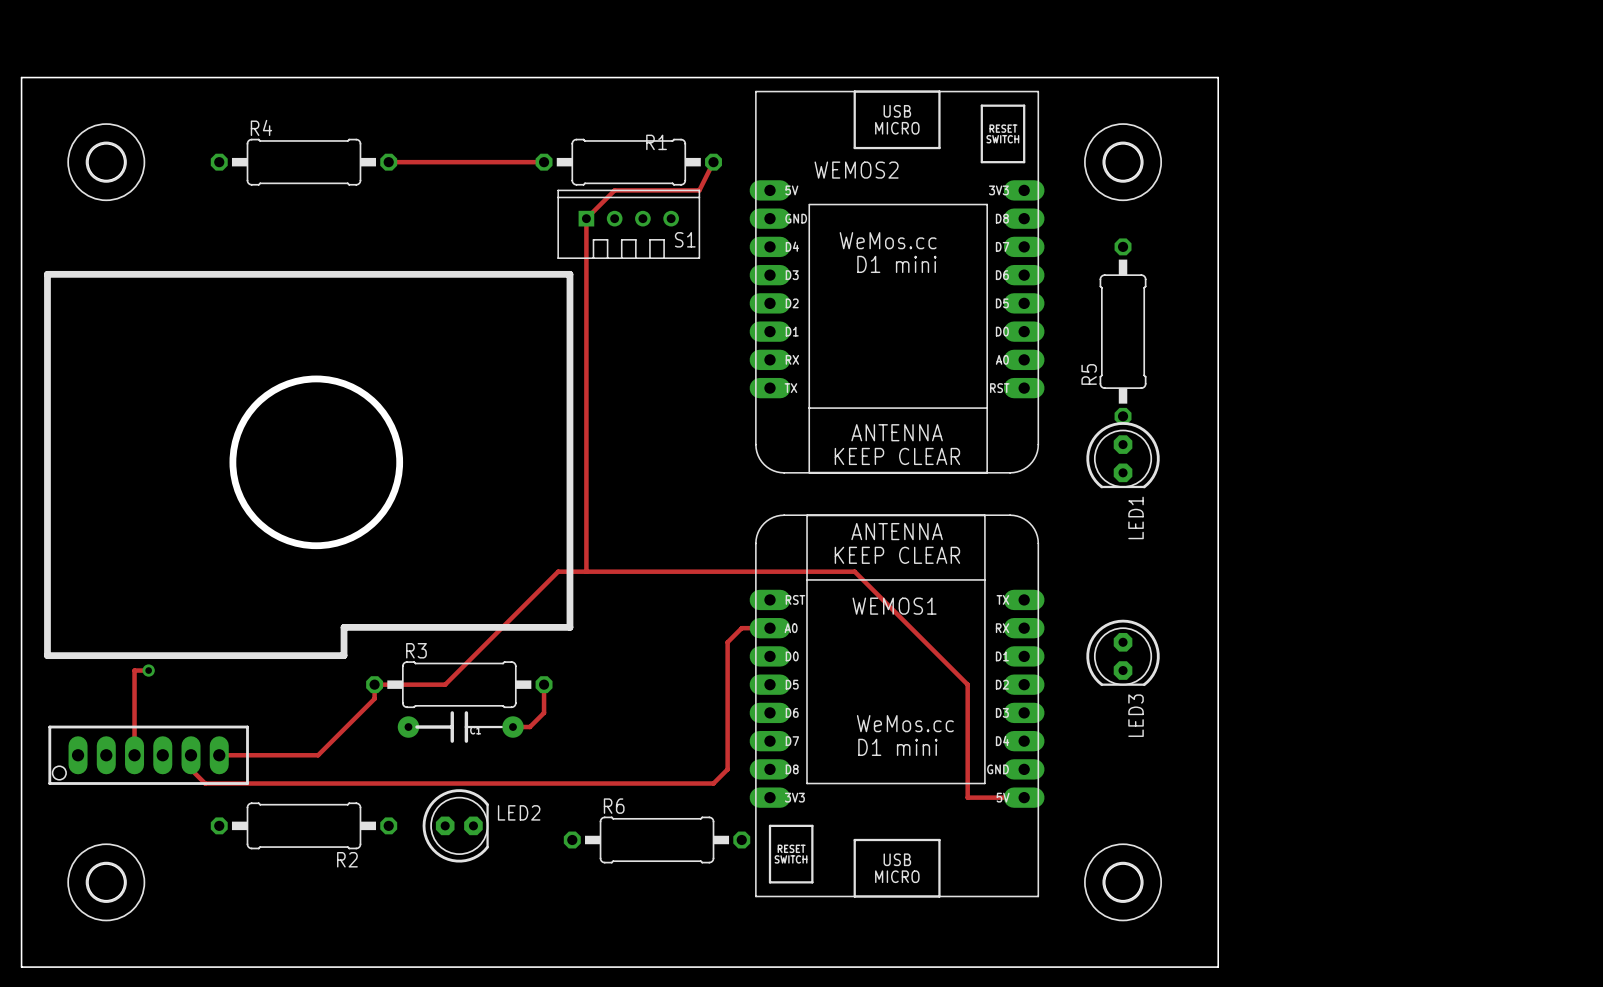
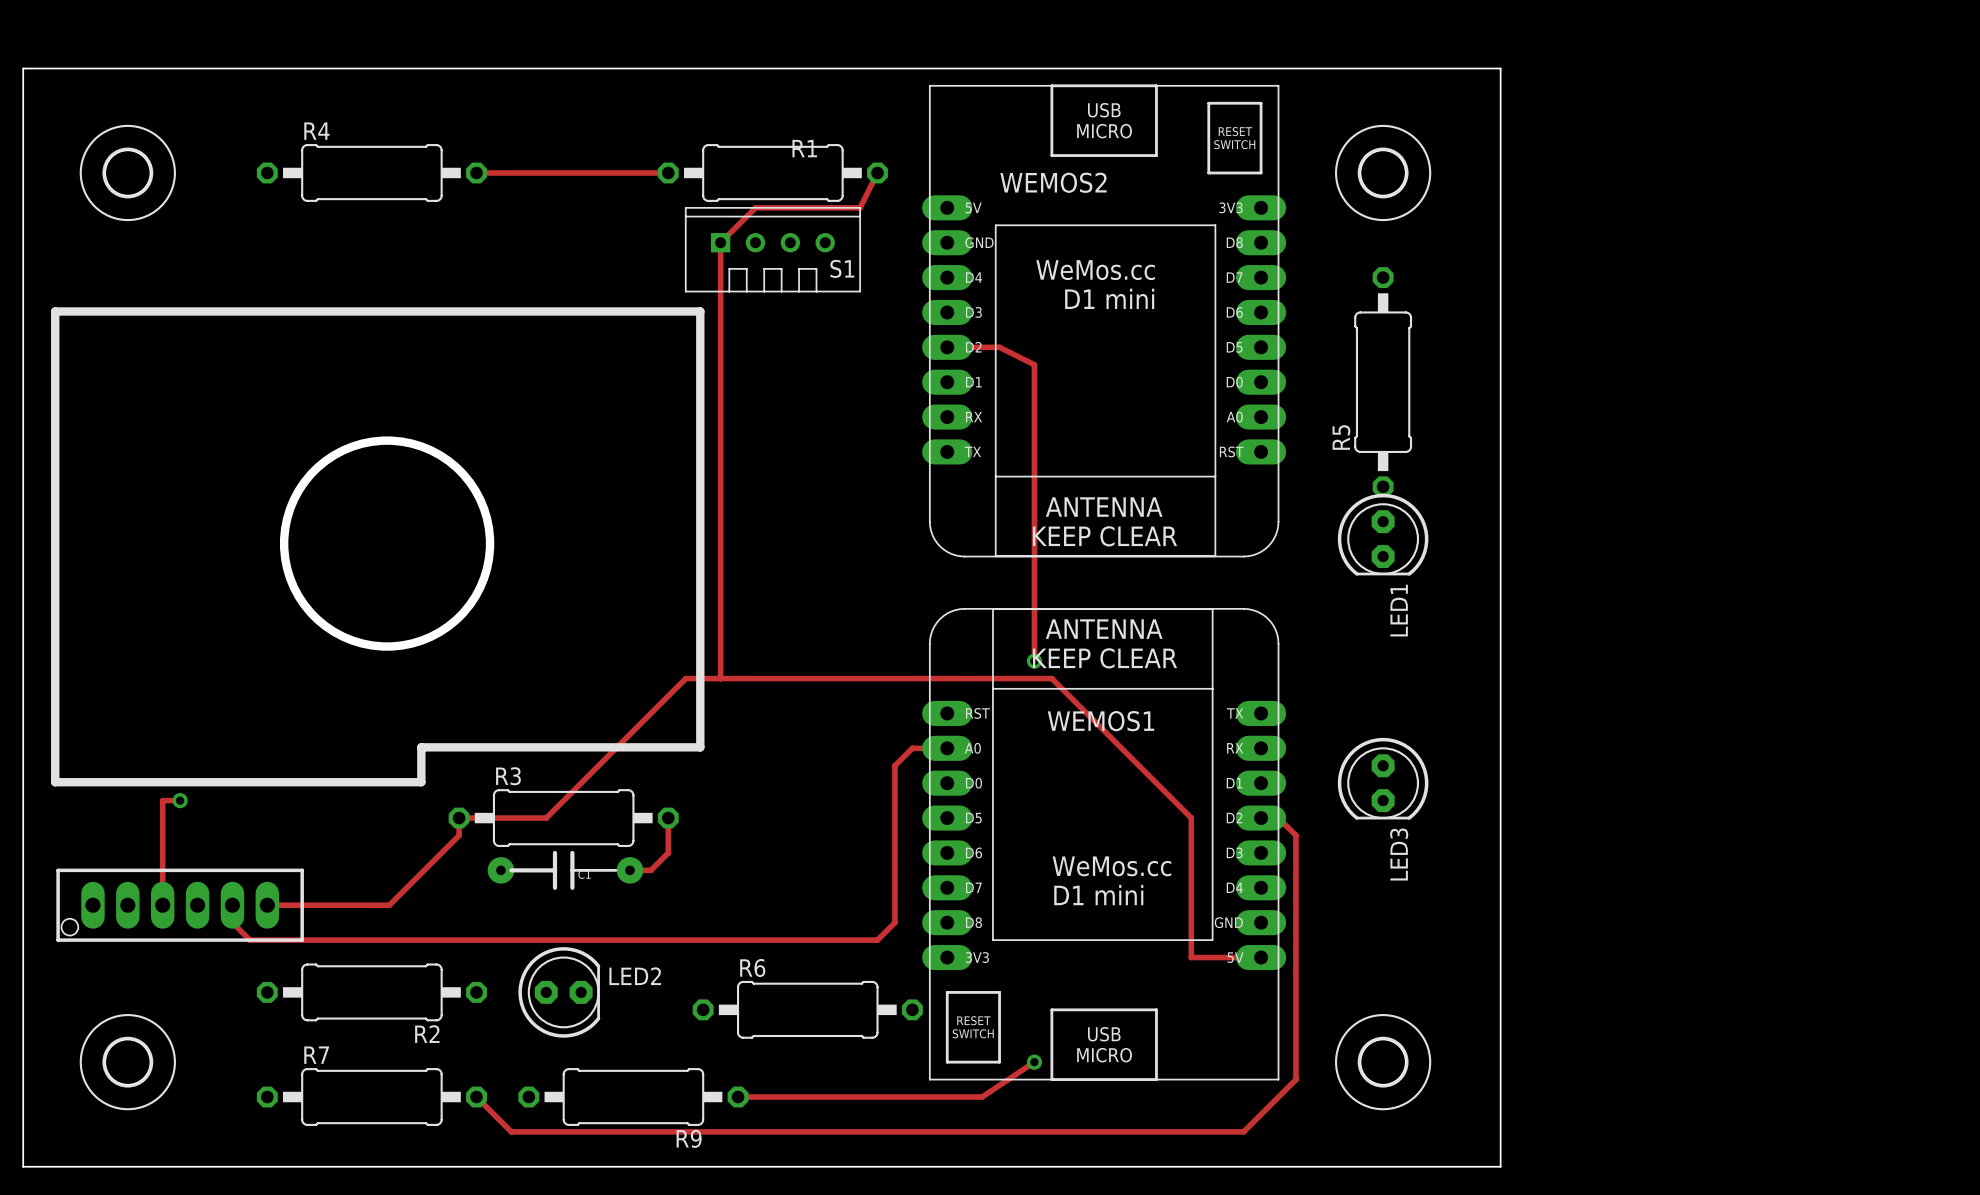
track: none -> (947, 347) (999, 347) (1034, 364) (1034, 661)
via: none -> (1034, 661)
track: none -> (1261, 818) (1278, 818) (1295, 835) (1295, 1079) (1243, 1131) (511, 1131) (476, 1097)
track: none -> (1034, 1062) (982, 1097) (738, 1097)
via: none -> (1034, 1062)
R7: none -> (371, 1097)
R9: none -> (633, 1097)

